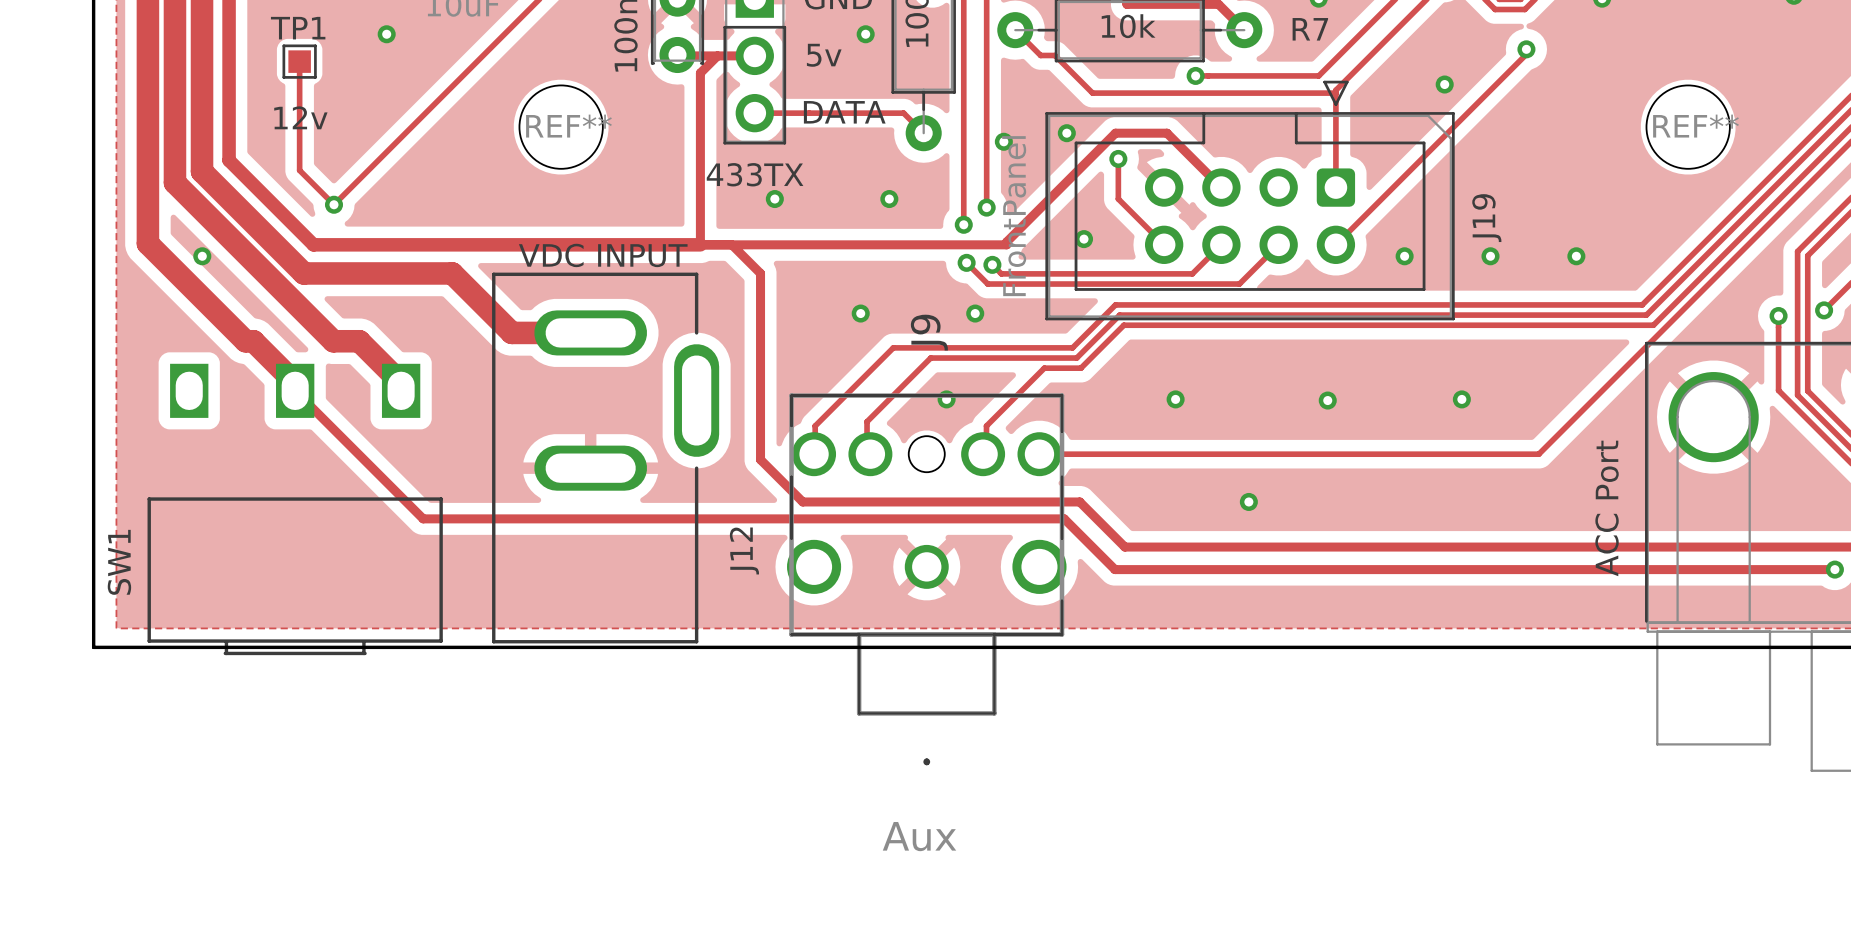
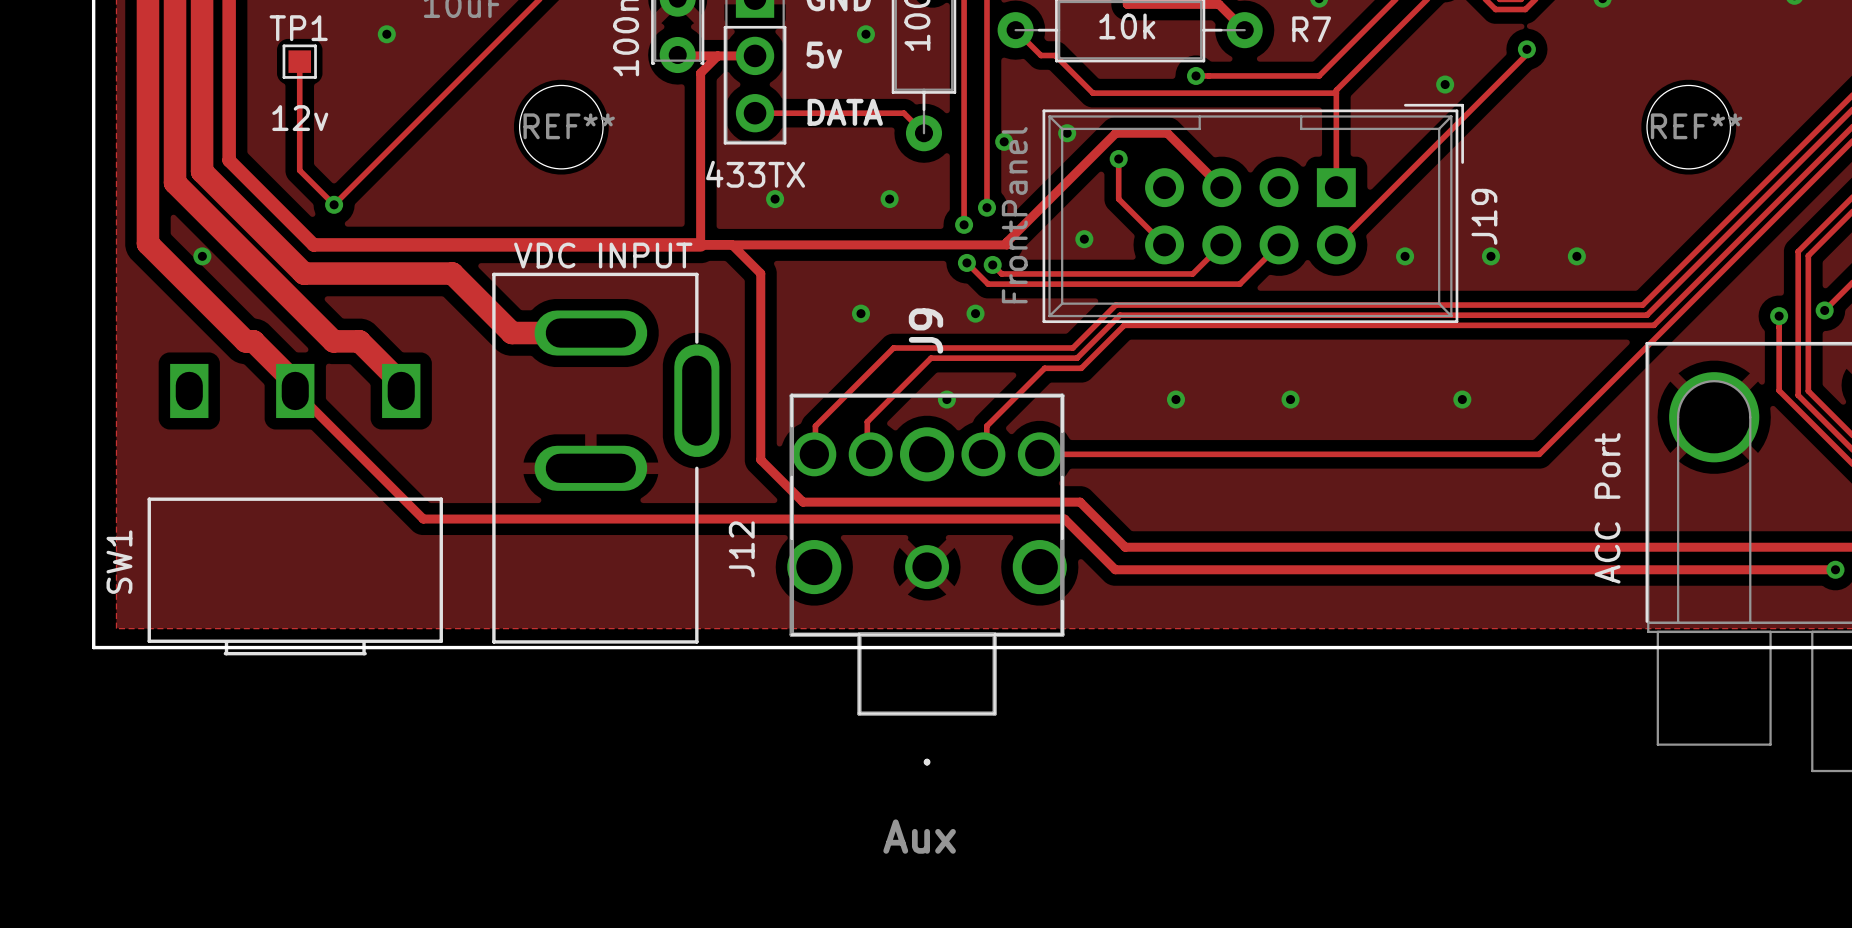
J19 footprint: [1045, 80, 1455, 321] -> [1042, 103, 1464, 324]
J12 footprint: [492, 272, 720, 644] -> [492, 272, 720, 644]
J9 footprint: [787, 393, 1067, 766] -> [787, 393, 1067, 766]
via position: (1327, 400) -> (1290, 399)
via: (1248, 501) -> none

